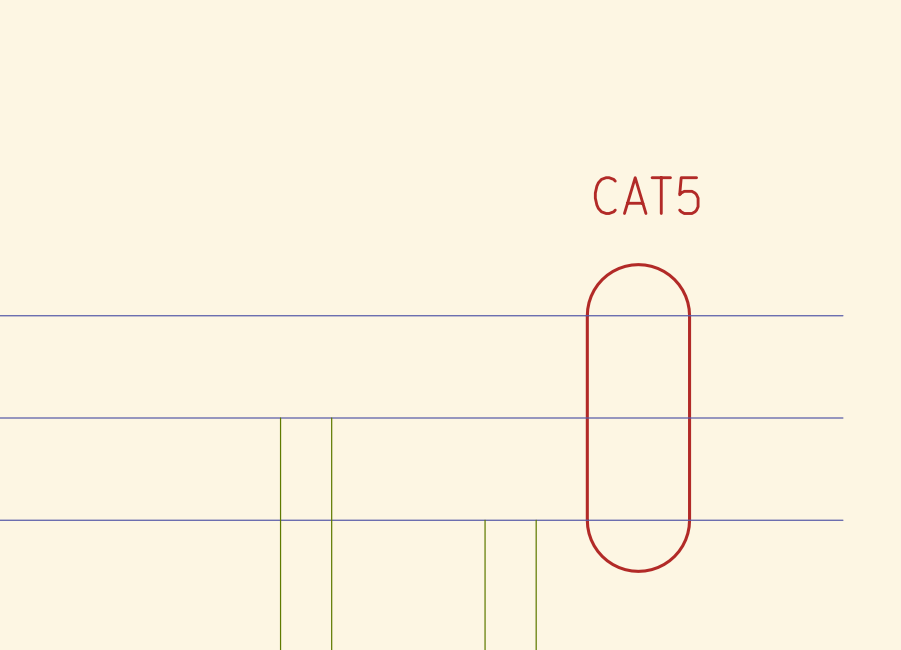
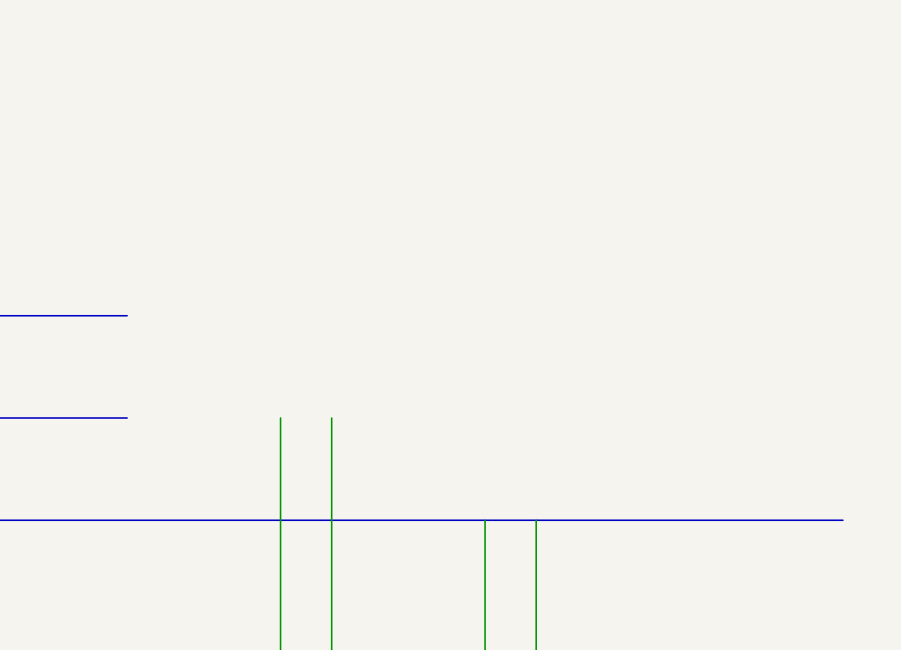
text: CAT5 (646, 195) -> none
bus: (127, 315) (842, 315) -> none
line: (587, 315) (587, 520) (589, 533) (597, 551) (612, 564) (631, 570) (651, 569) (663, 564) (674, 556) (685, 539) (689, 526) (689, 315) (687, 302) (678, 284) (669, 275) (651, 266) (631, 265) (618, 268) (602, 279) (591, 296) (587, 315) -> none
bus: (127, 418) (842, 418) -> none

